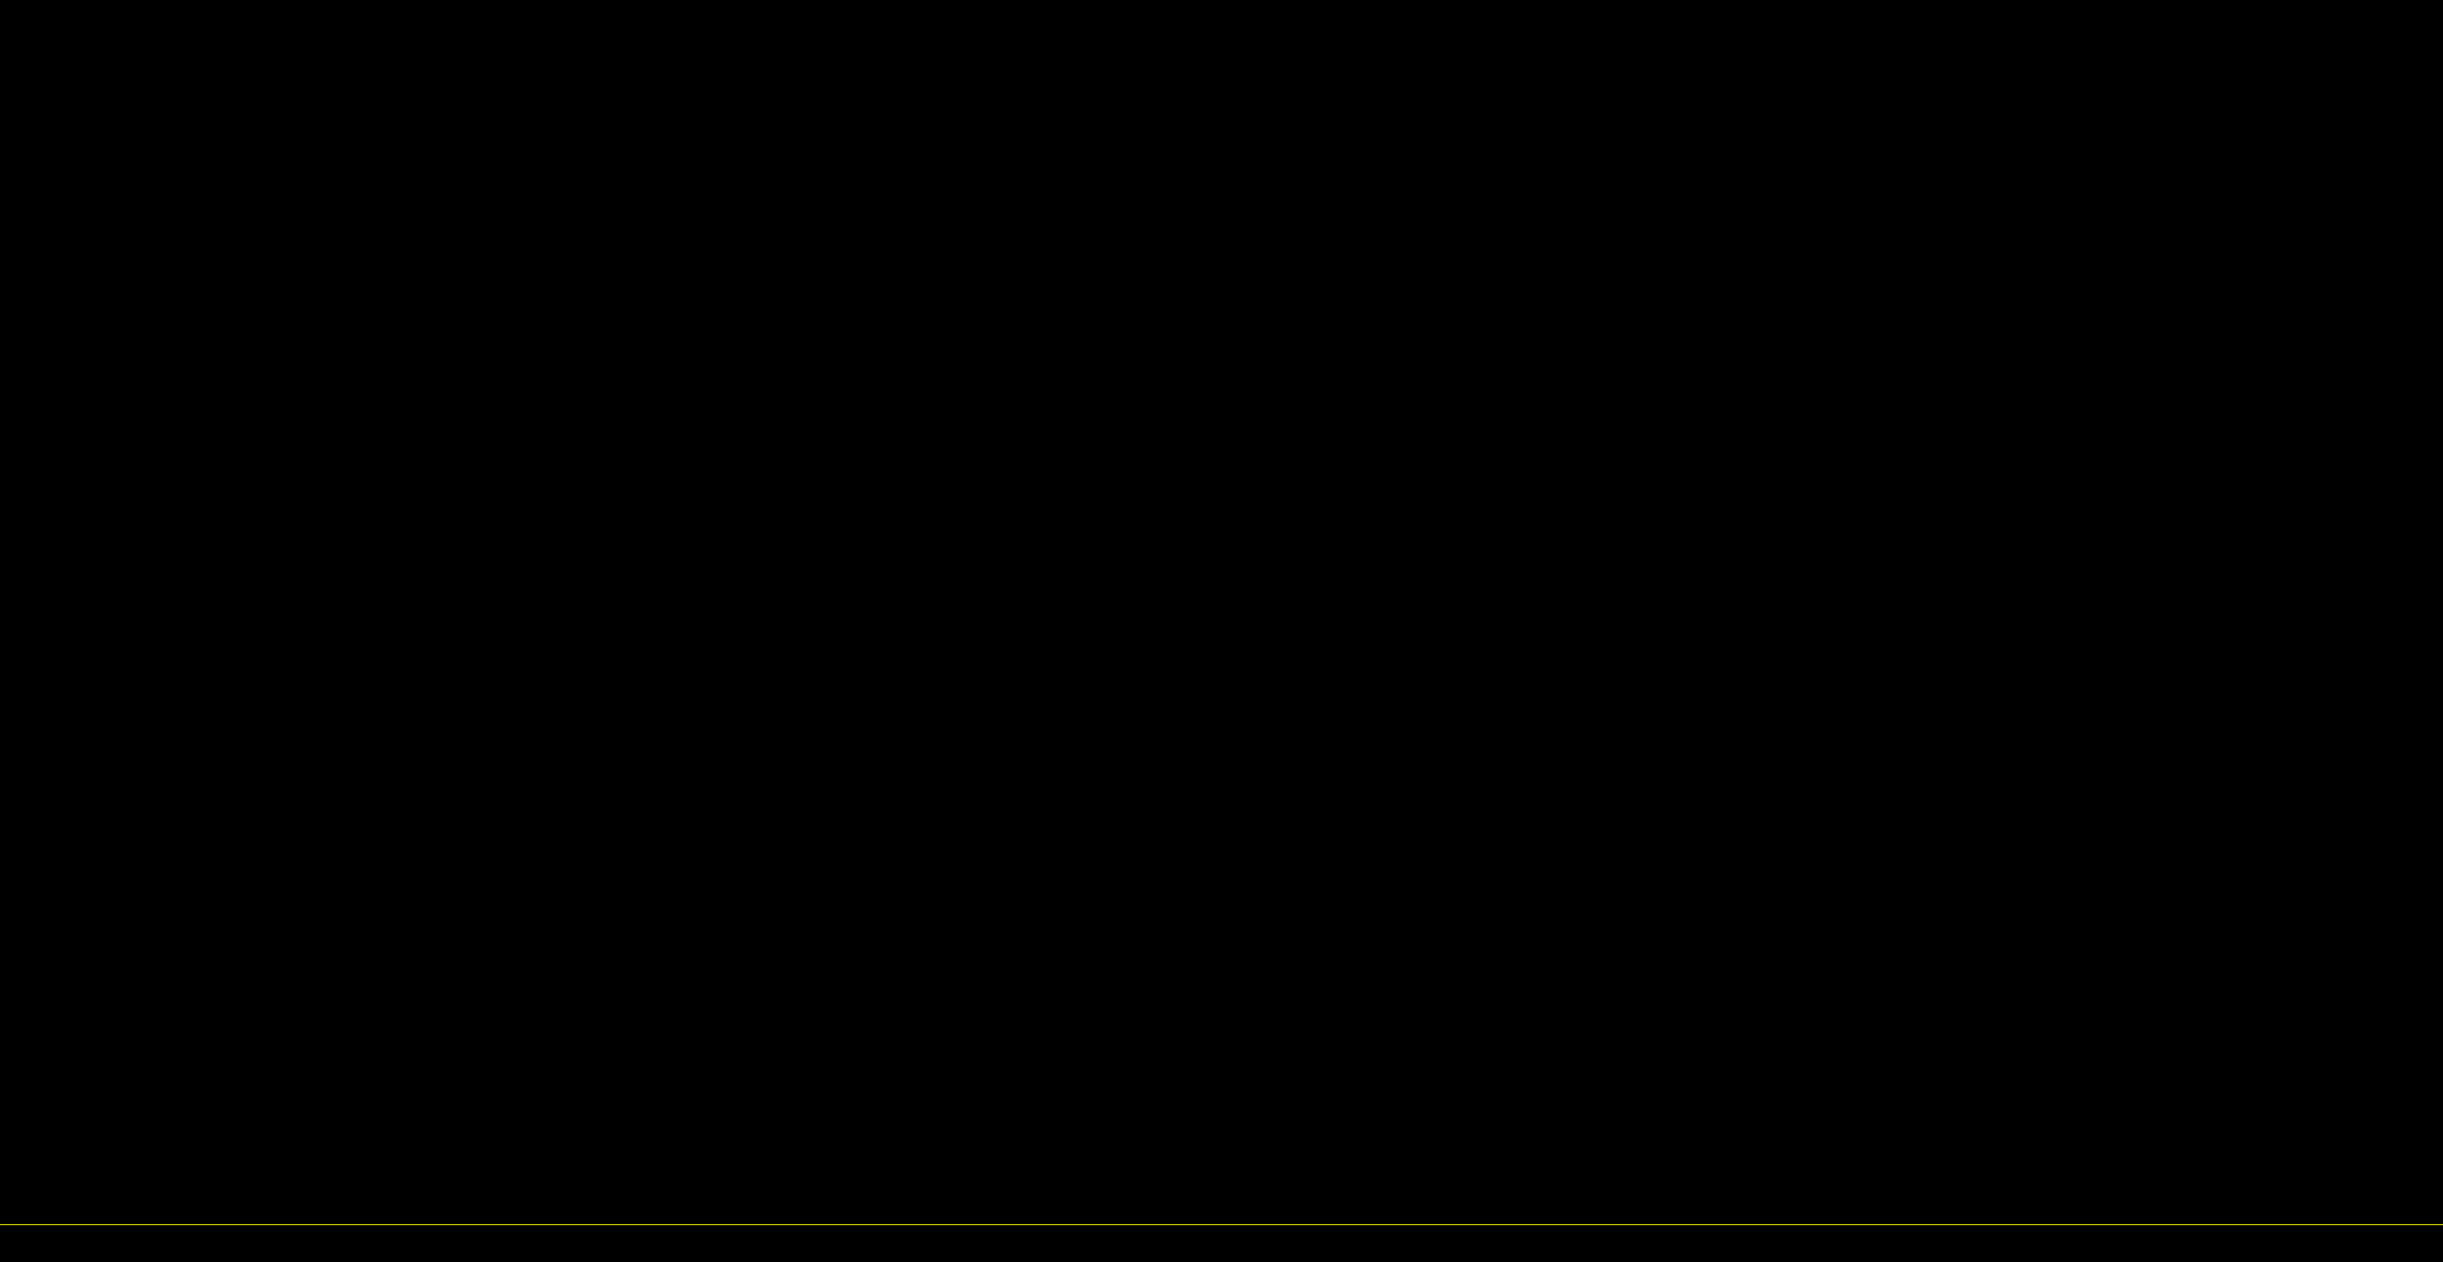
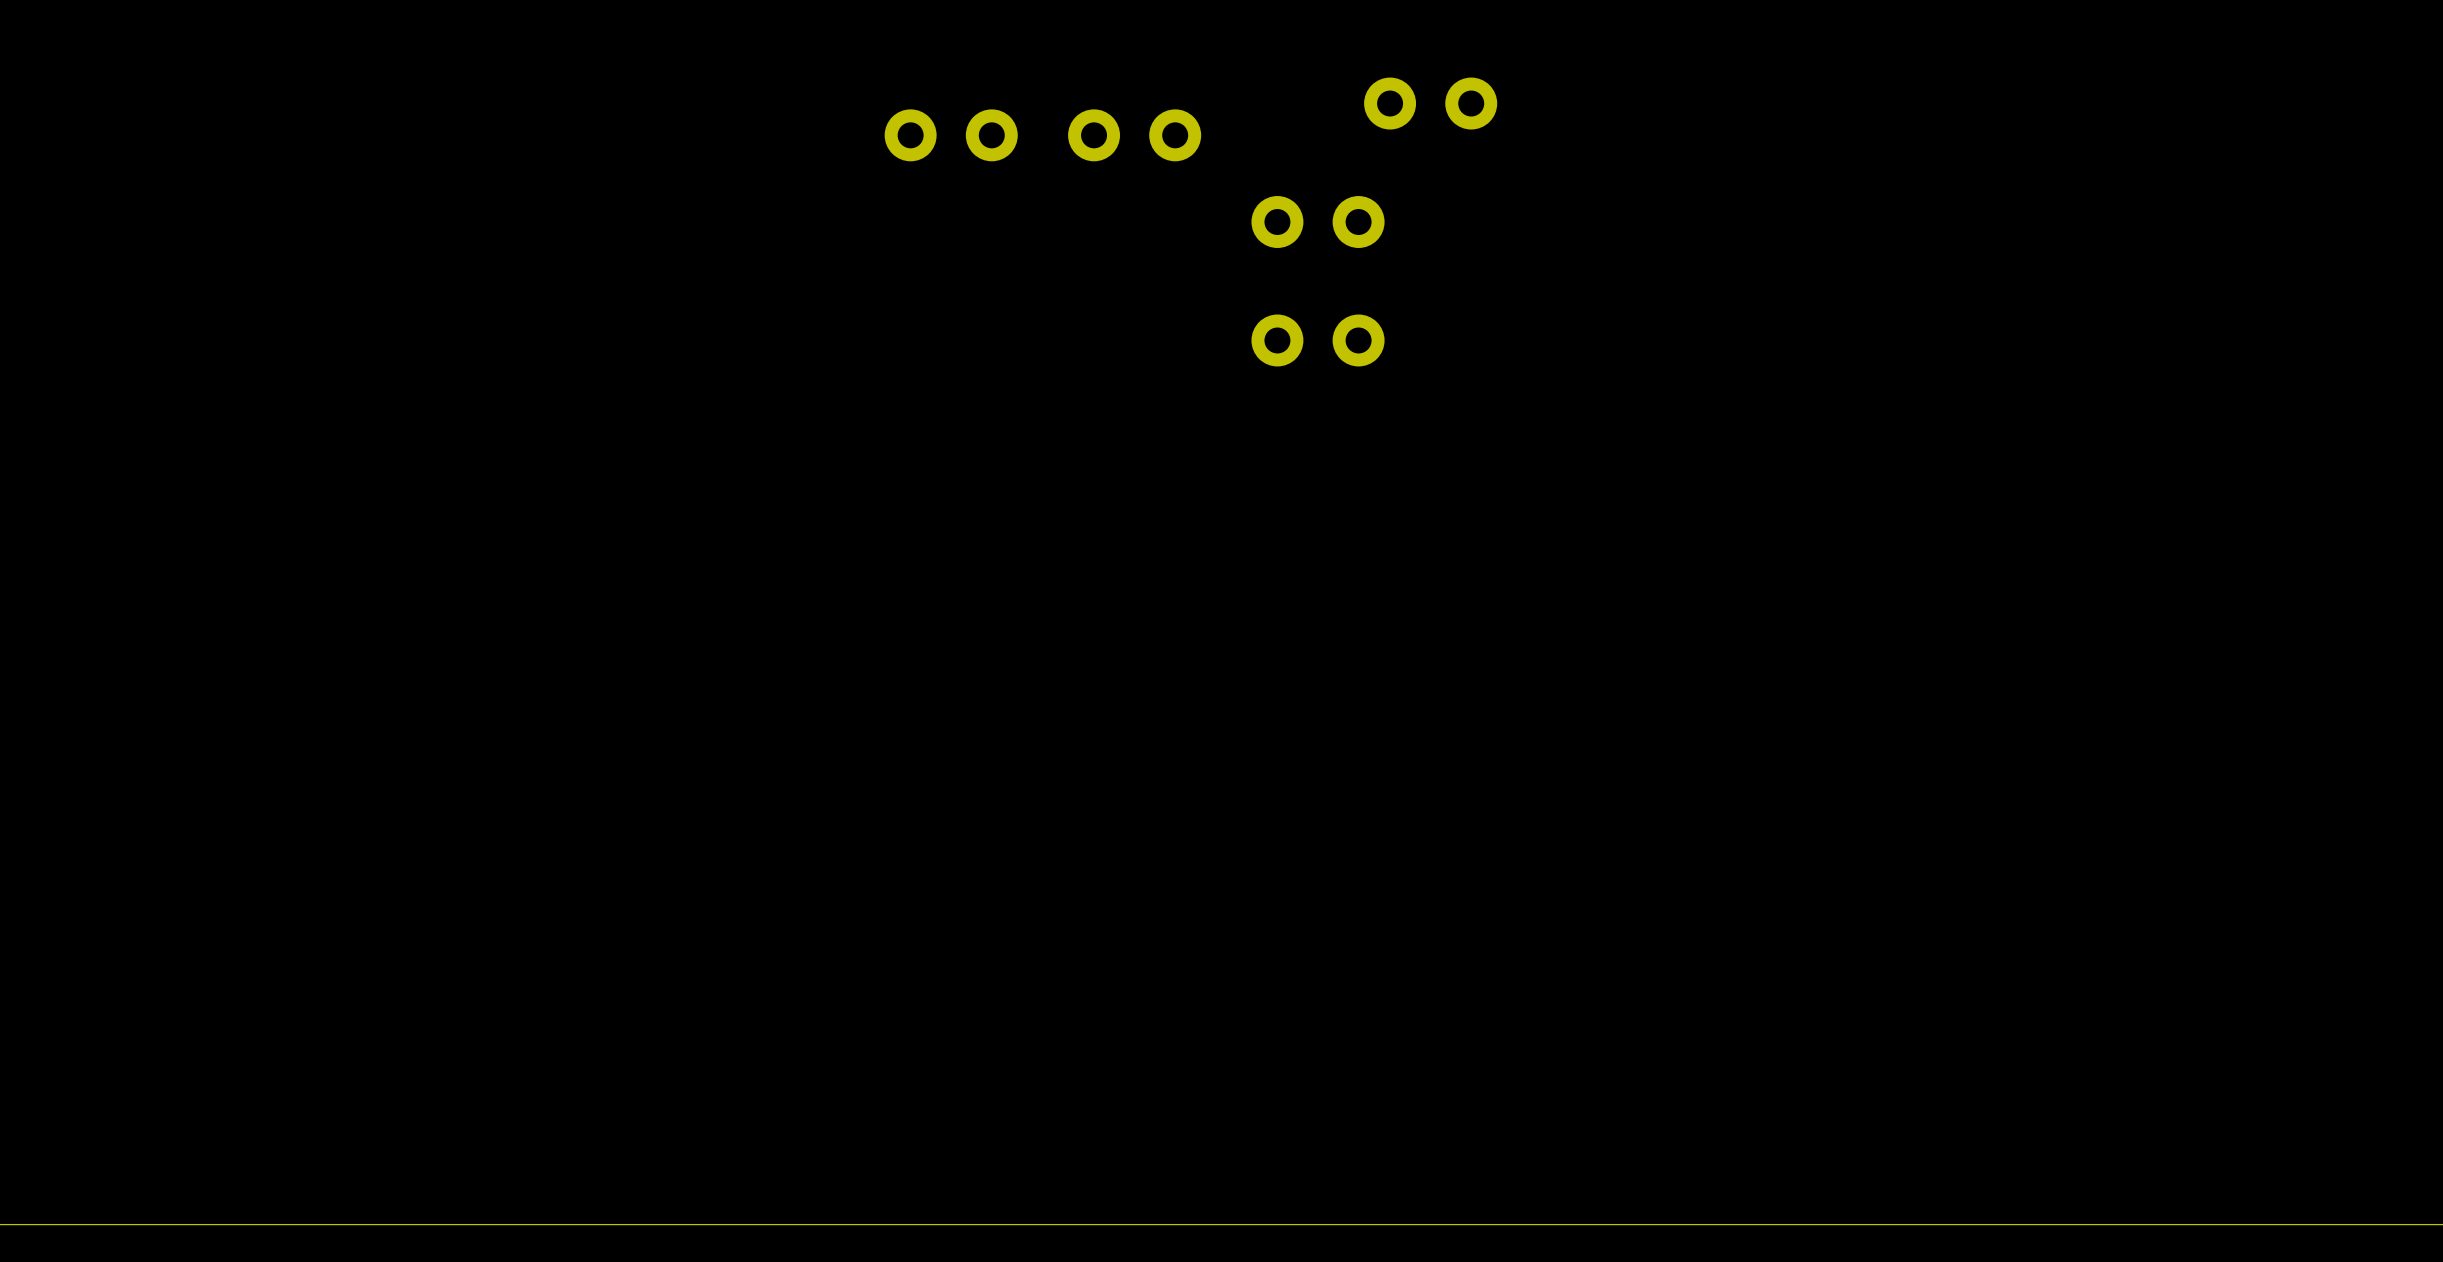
part: none -> (1430, 103)
part: none -> (951, 135)
part: none -> (1134, 135)
part: none -> (1318, 222)
part: none -> (1318, 340)

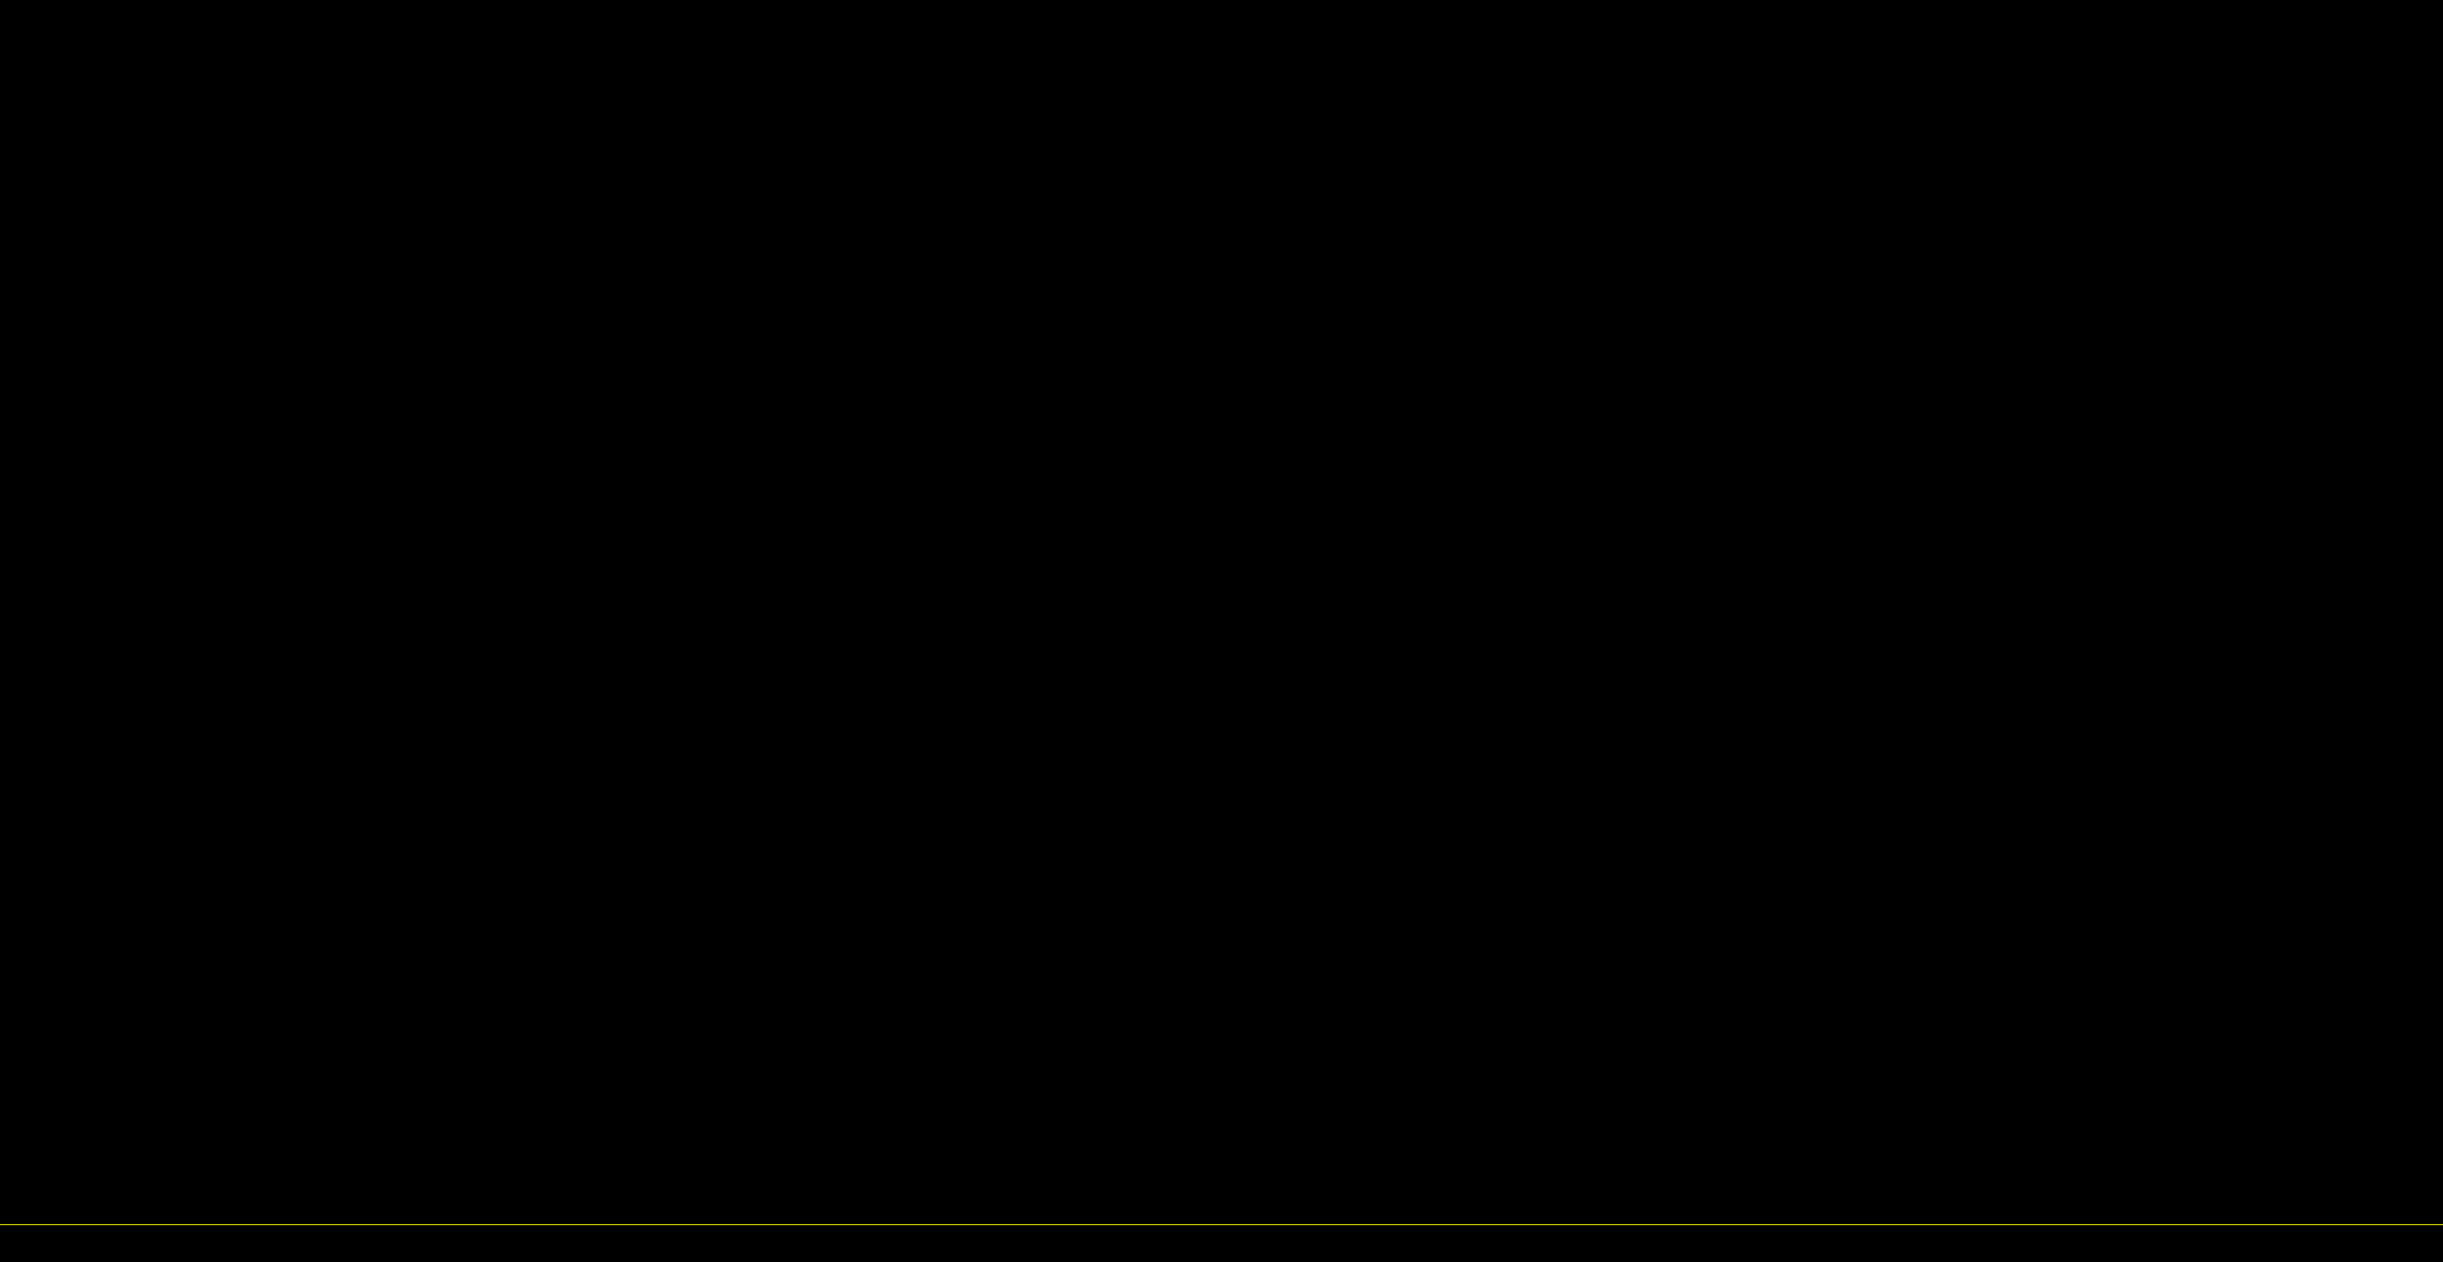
part: (1430, 103) -> none
part: (951, 135) -> none
part: (1134, 135) -> none
part: (1318, 222) -> none
part: (1318, 340) -> none

